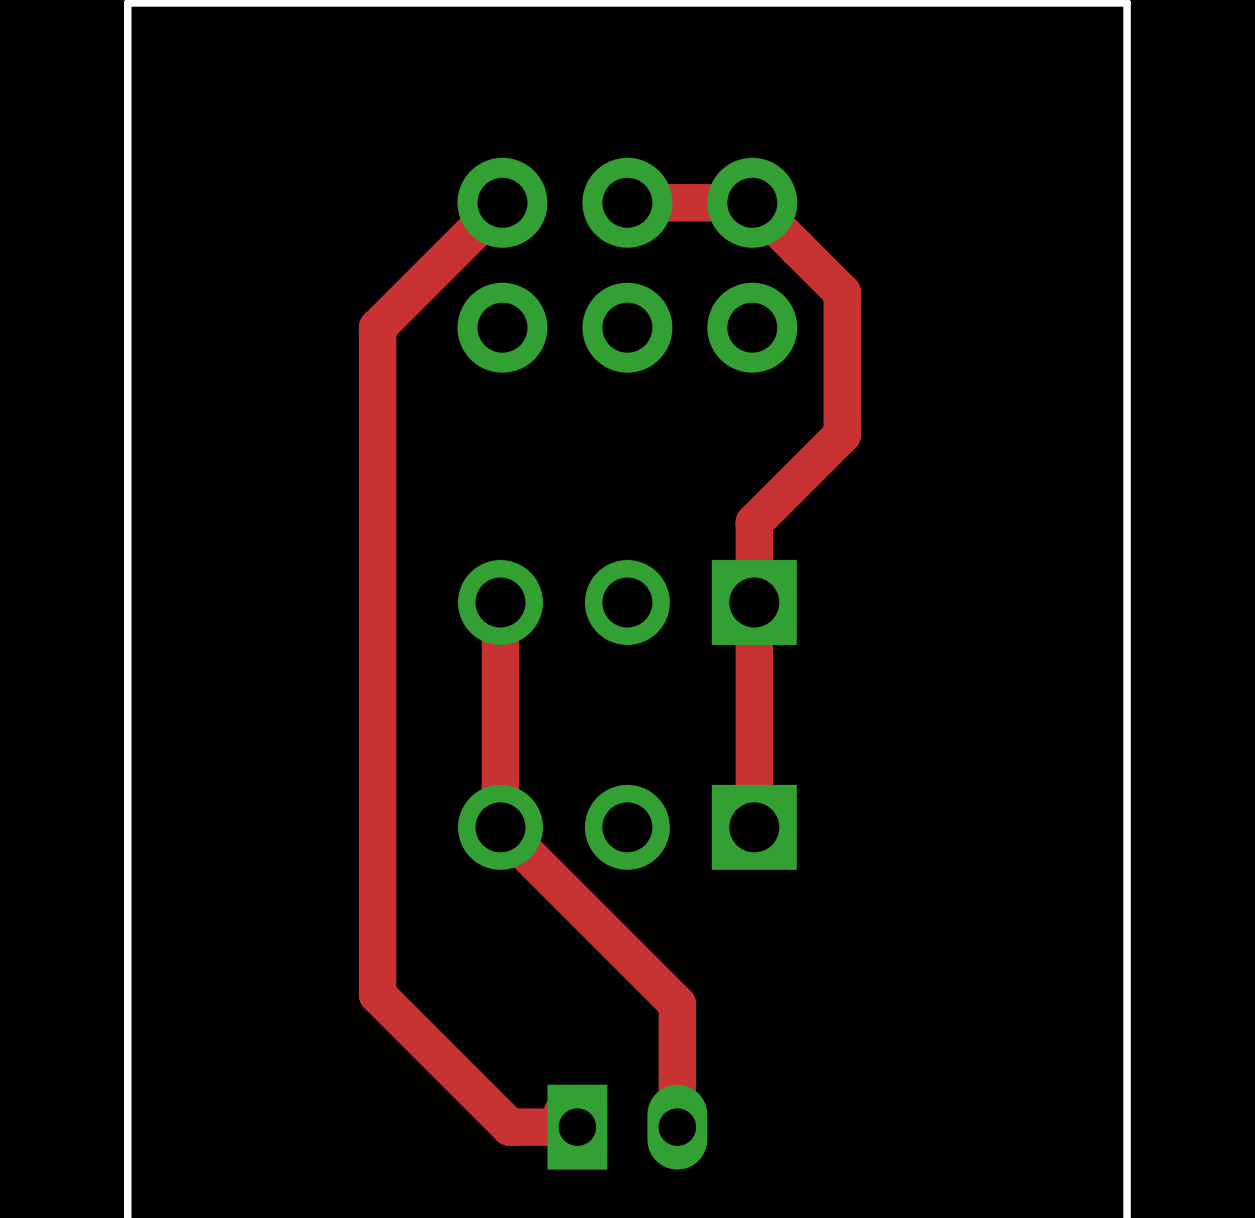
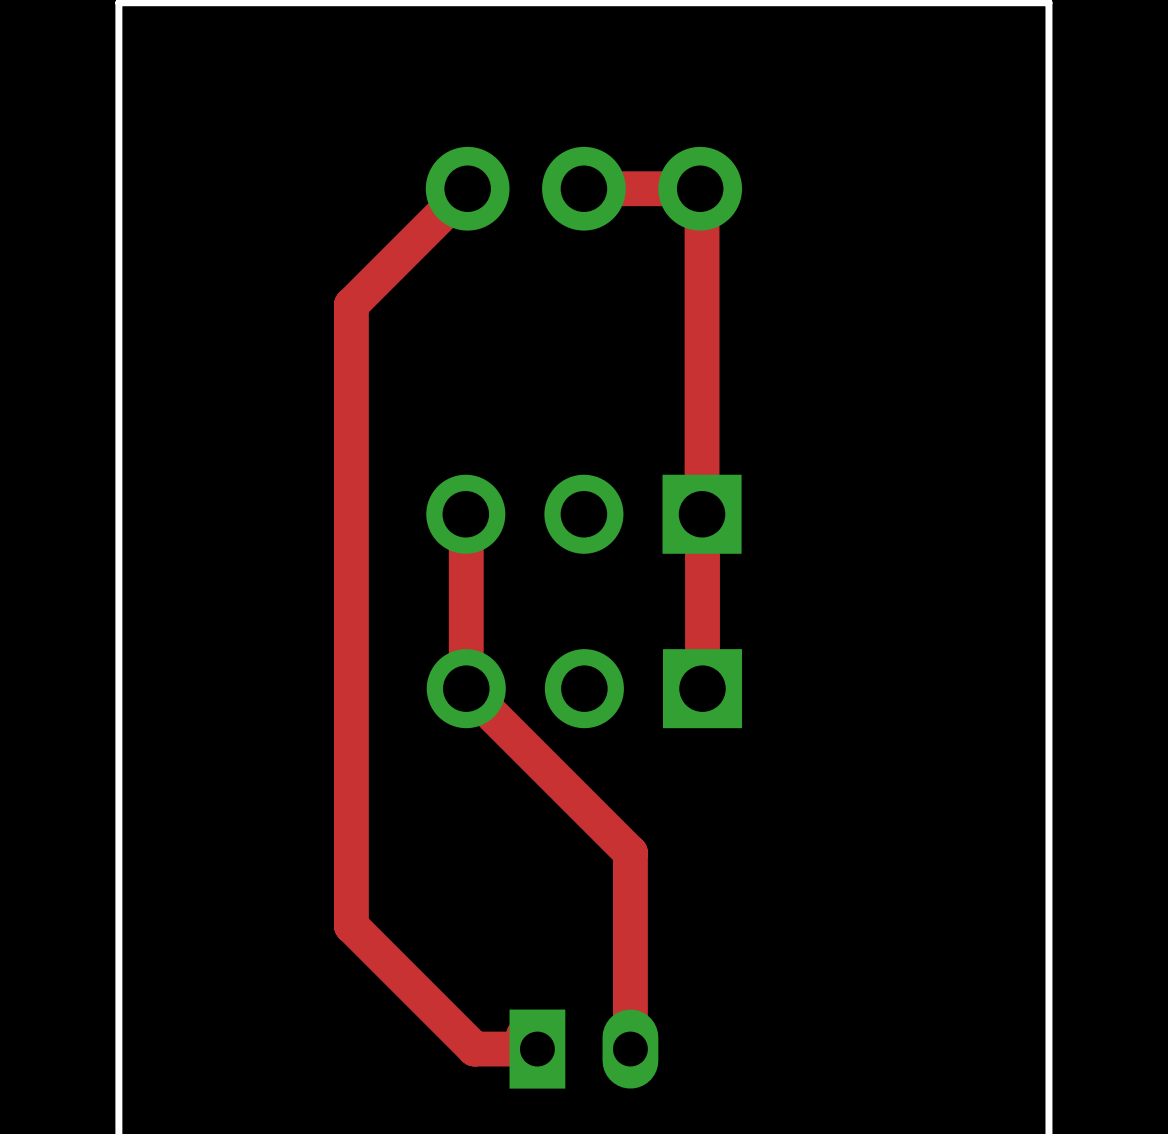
part: none -> (583, 188)
track: (754, 204) (842, 292) (842, 434) (754, 522) -> (702, 190) (702, 486)
part: (627, 265) -> none
track: (754, 552) (754, 827) -> (702, 514) (702, 688)
track: (500, 602) (500, 827) (677, 1004) -> (466, 514) (466, 688) (630, 852) (630, 934)
part position: (627, 602) -> (583, 514)
part position: (627, 827) -> (584, 688)

